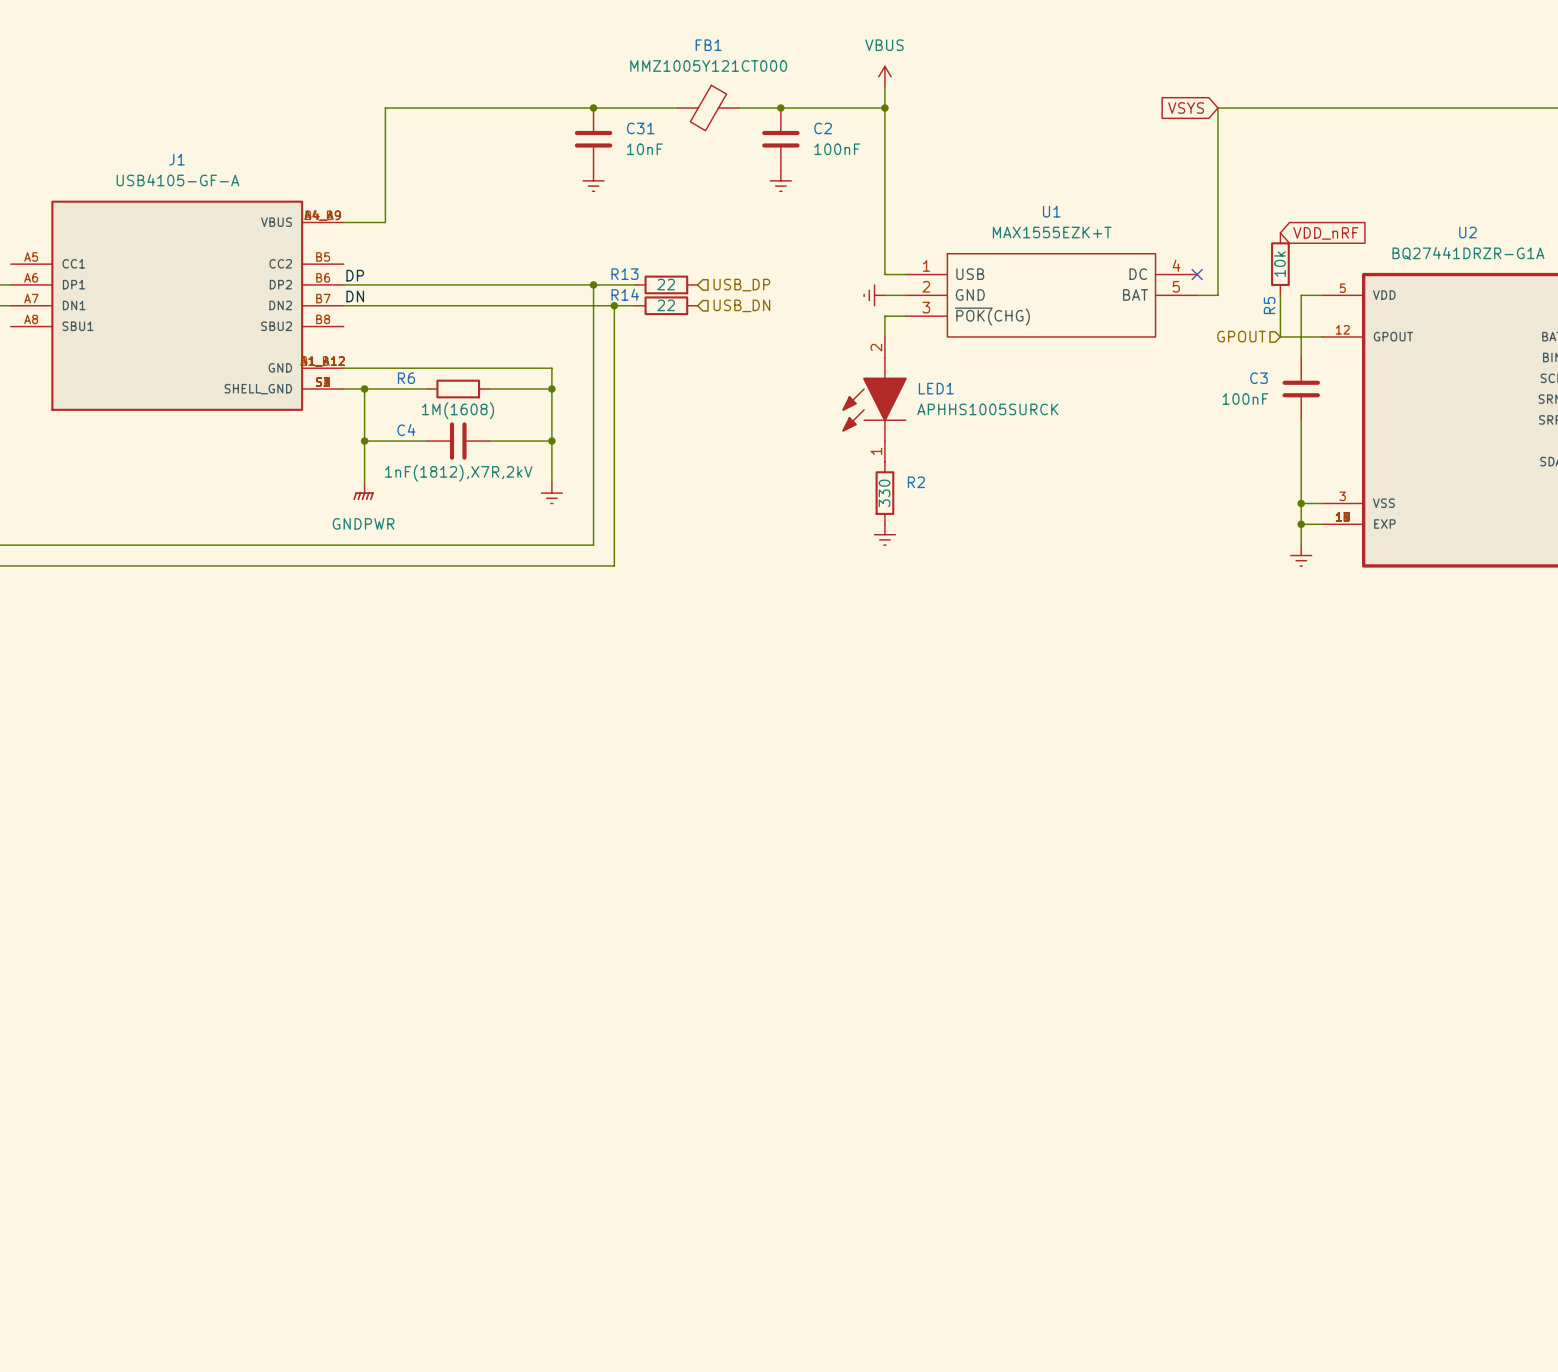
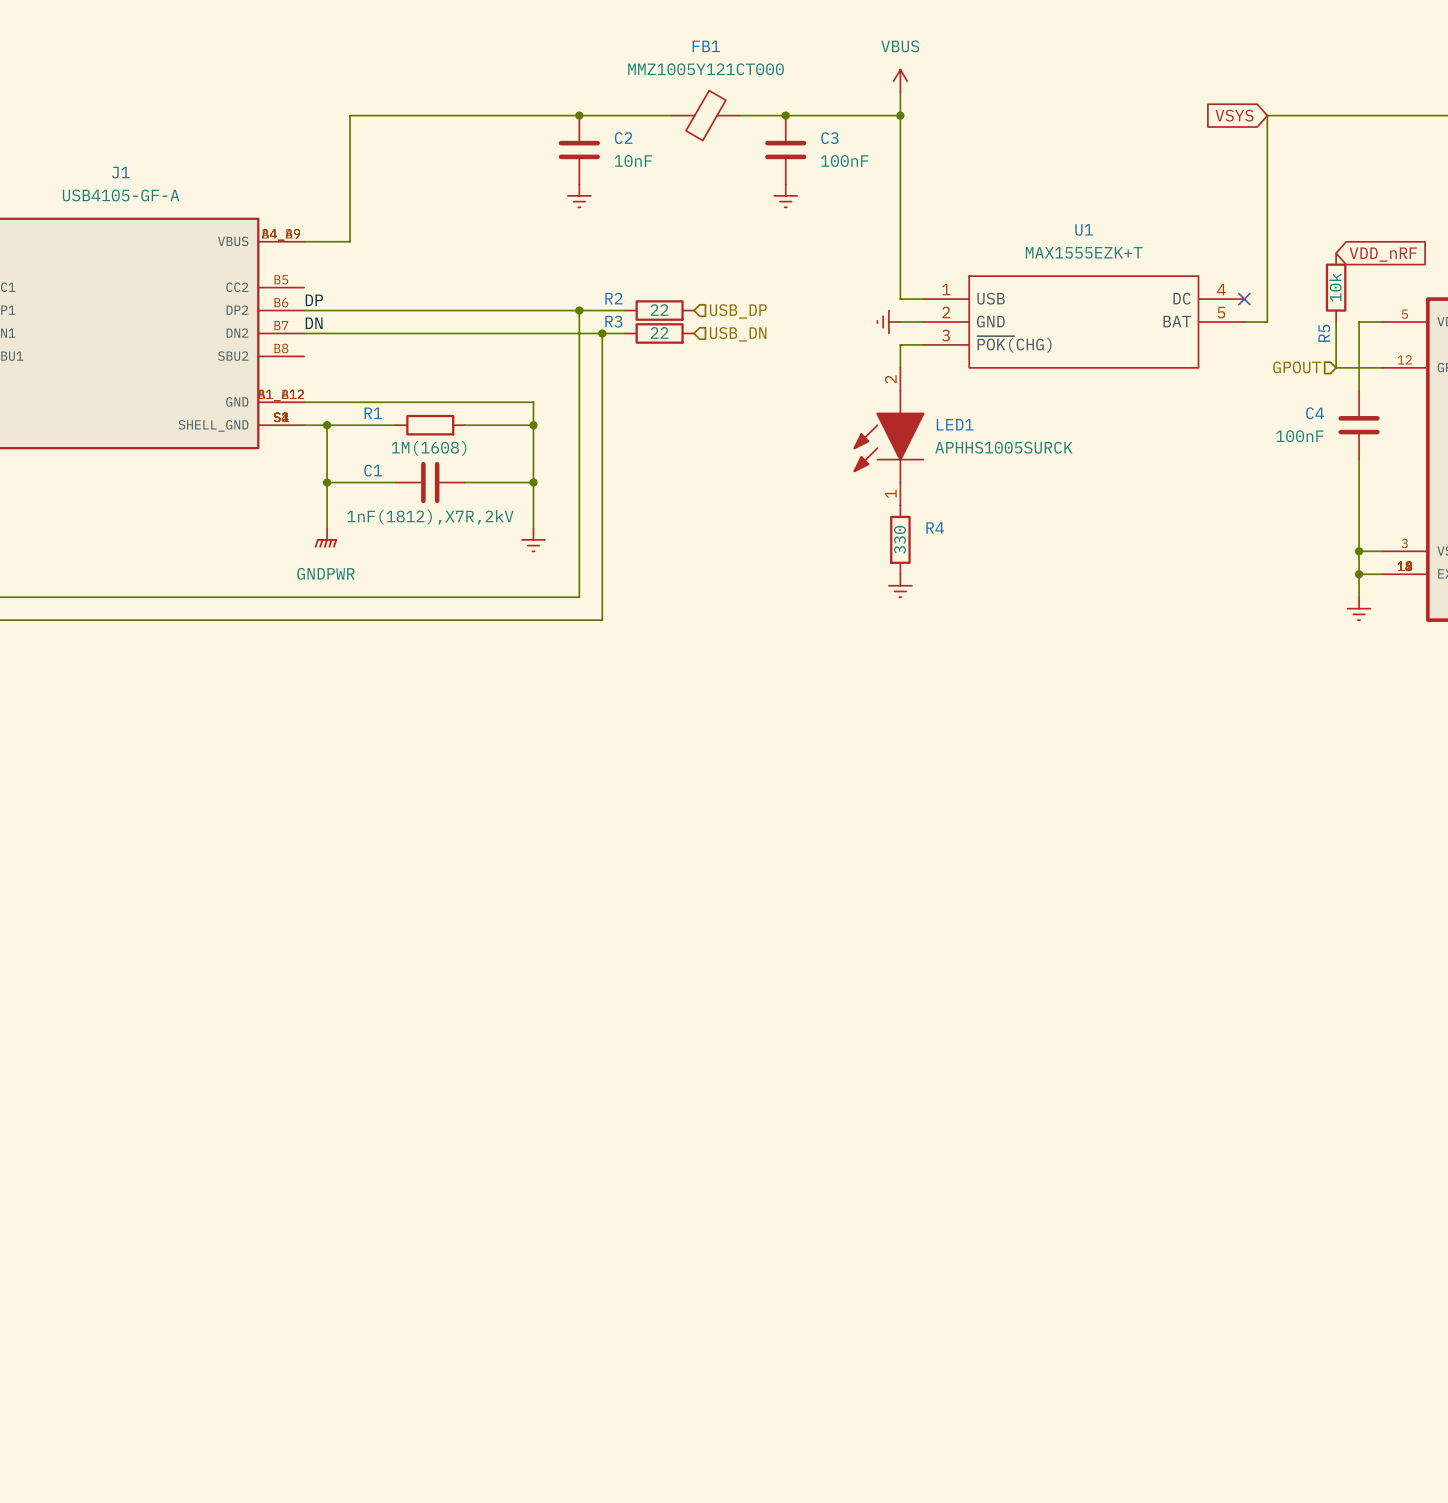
C31 name: C31 (640, 128) -> C2 (623, 138)
C2 name: C2 (823, 128) -> C3 (829, 138)
R13 name: R13 (625, 274) -> R2 (613, 298)
R14 name: R14 (625, 294) -> R3 (613, 321)
R6 name: R6 (406, 378) -> R1 (373, 413)
C3 name: C3 (1259, 378) -> C4 (1315, 413)
C4 name: C4 (406, 430) -> C1 (373, 470)
R2 name: R2 (916, 482) -> R4 (935, 527)

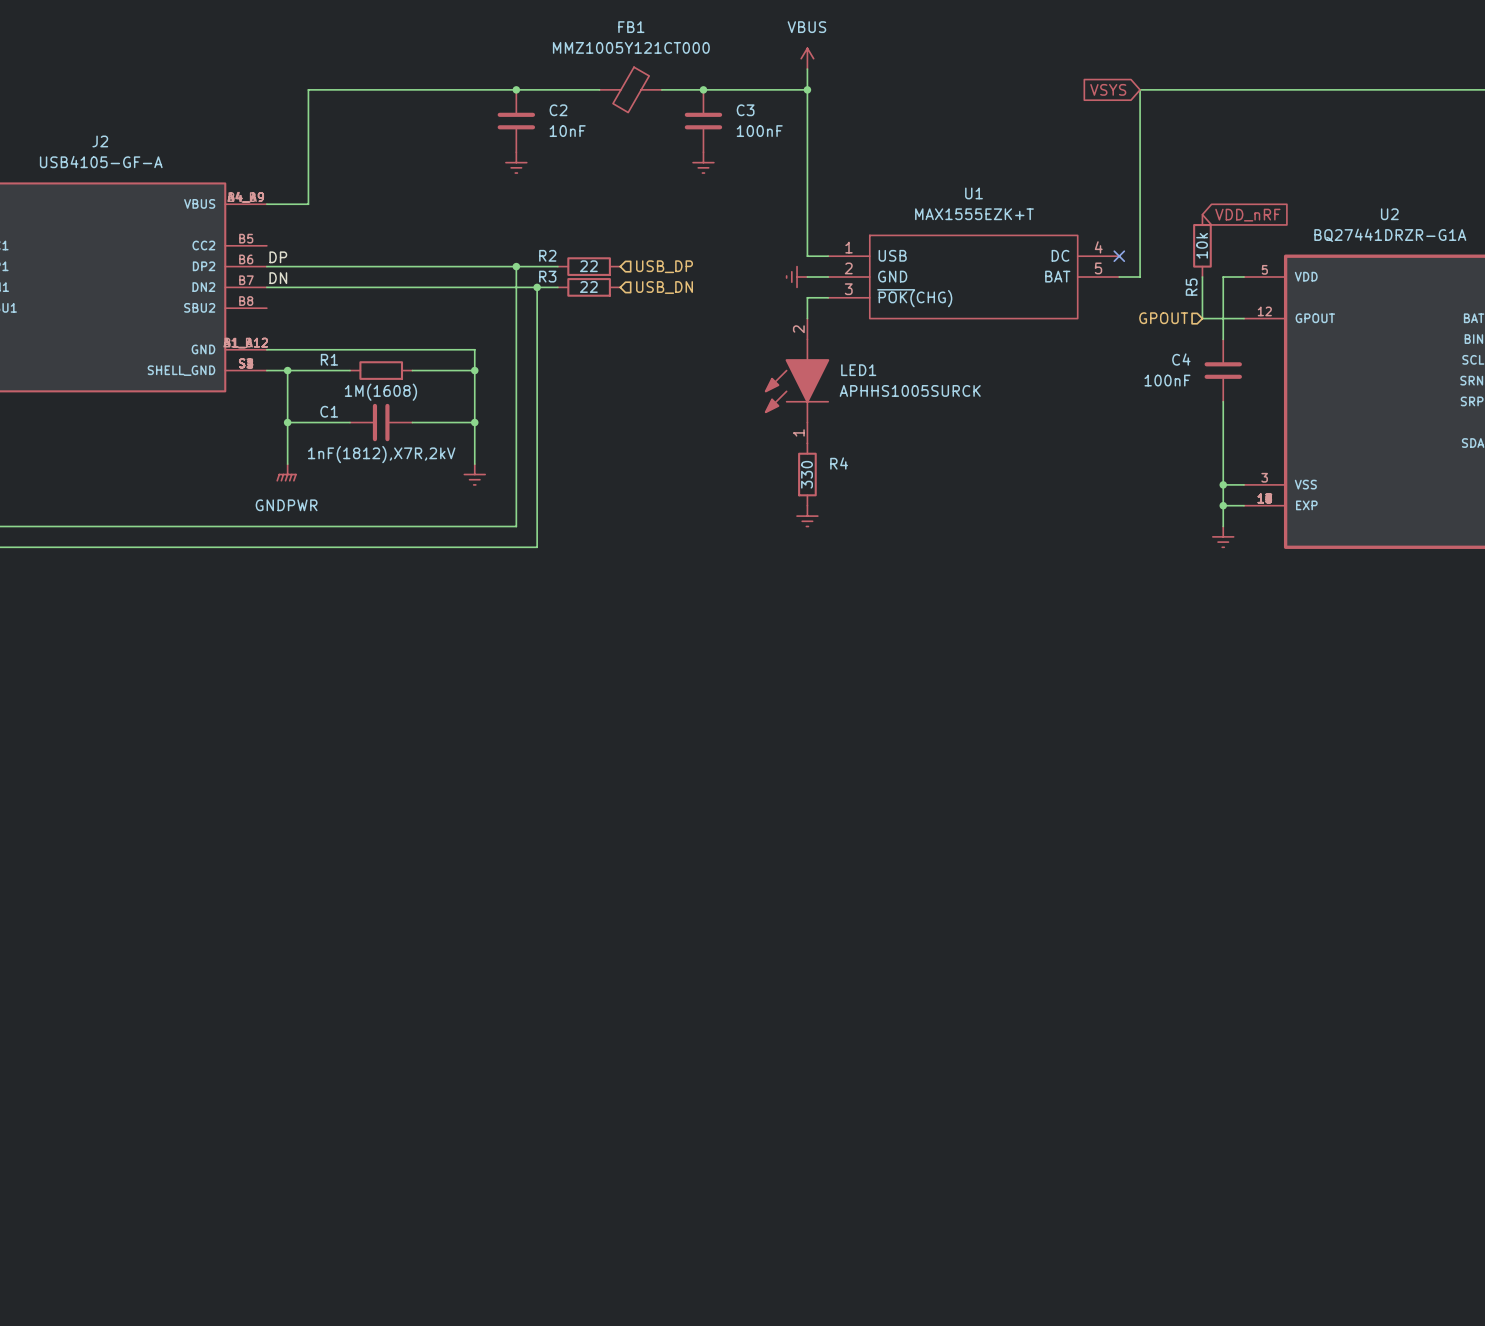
J1 name: J1 (120, 172) -> J2 (100, 141)

